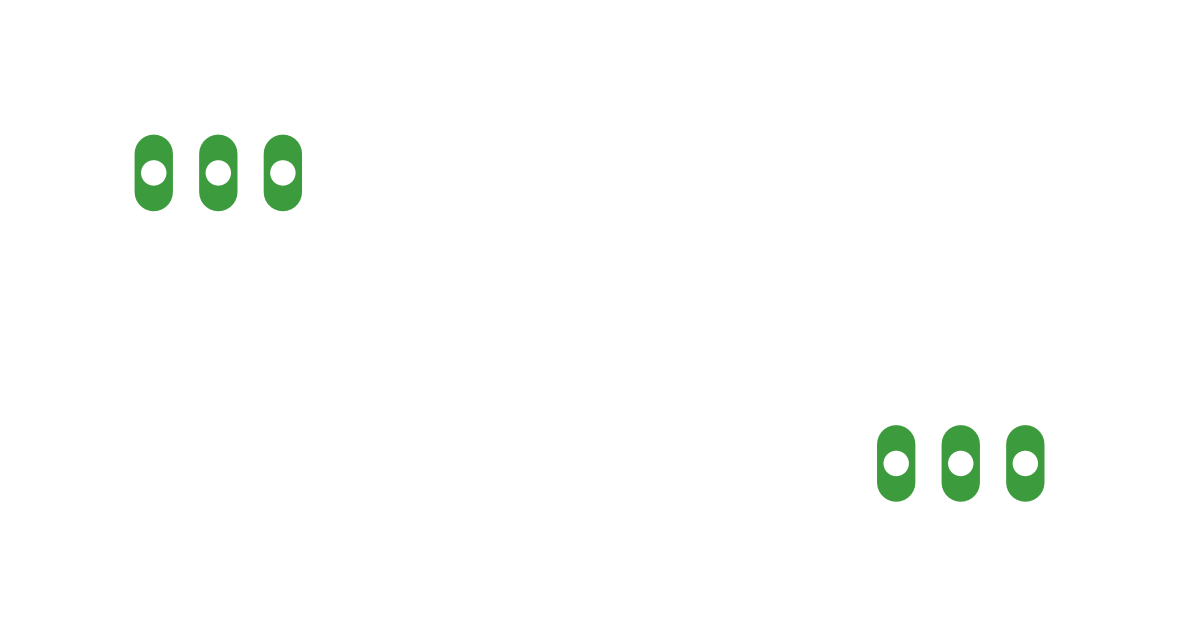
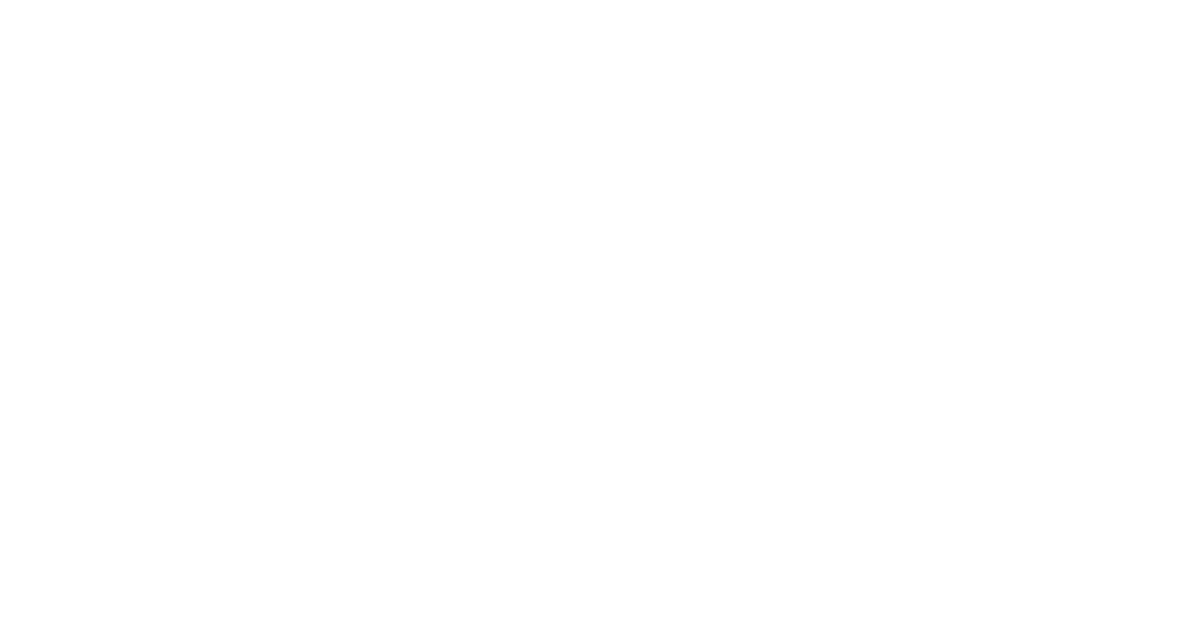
part: (218, 172) -> none
part: (960, 463) -> none

